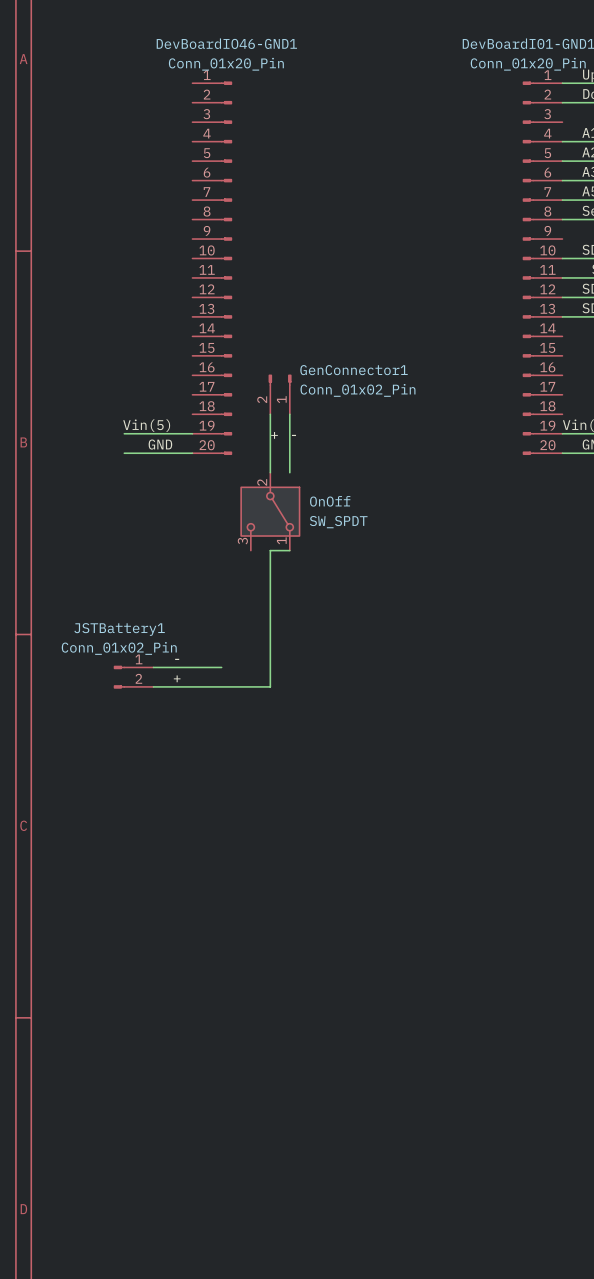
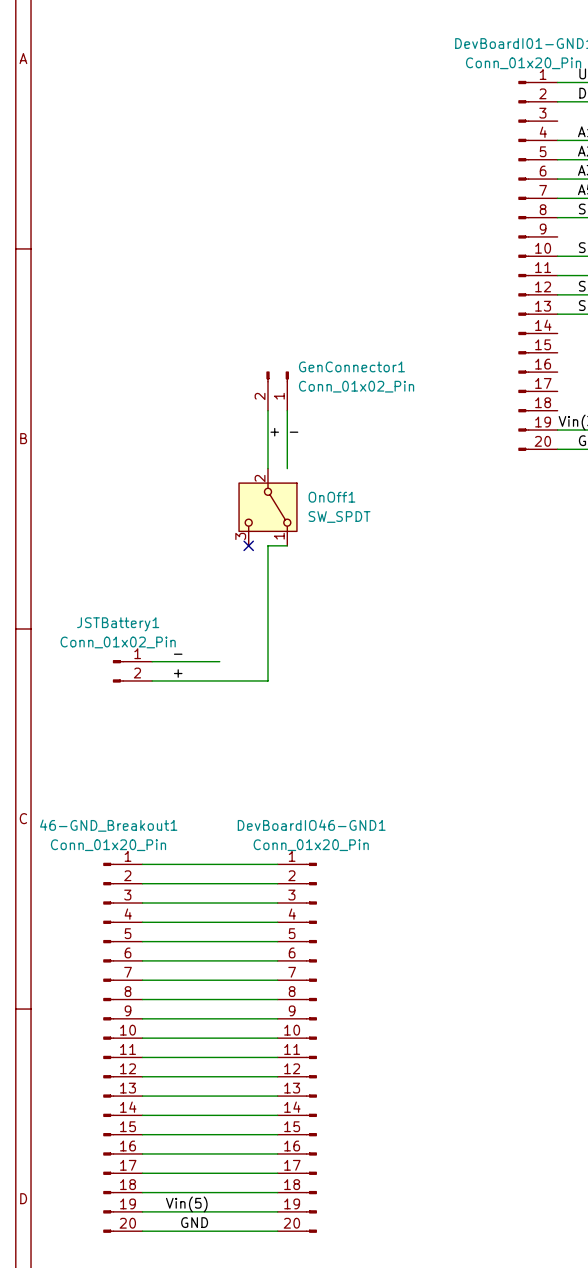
DevBoardIO46-GND1 position: (212, 268) -> (297, 1047)
label: Vin(5) (146, 425) -> none
wire: (124, 433) (192, 433) -> none
label: GND (160, 444) -> none
wire: (124, 453) (192, 453) -> none
OnOff name: OnOff (330, 501) -> OnOff1 (331, 497)
no-connect mark: none -> (248, 545)
wire: none -> (142, 864) (277, 864)
wire: none -> (142, 883) (277, 883)
wire: none -> (142, 903) (277, 903)
wire: none -> (142, 922) (277, 922)
wire: none -> (142, 941) (277, 941)
wire: none -> (142, 960) (277, 960)
wire: none -> (142, 980) (277, 980)
wire: none -> (142, 999) (277, 999)
wire: none -> (142, 1018) (277, 1018)
wire: none -> (142, 1038) (277, 1038)
46-GND_Breakout1: none -> Conn_01x20_Pin (122, 1047)
wire: none -> (142, 1057) (277, 1057)
wire: none -> (142, 1076) (277, 1076)
wire: none -> (142, 1096) (277, 1096)
wire: none -> (142, 1115) (277, 1115)
wire: none -> (142, 1134) (277, 1134)
wire: none -> (142, 1153) (277, 1153)
wire: none -> (142, 1173) (277, 1173)
wire: none -> (142, 1192) (277, 1192)
label: none -> Vin(5) (186, 1204)
wire: none -> (142, 1211) (277, 1211)
label: none -> GND (194, 1222)
wire: none -> (142, 1231) (277, 1231)

